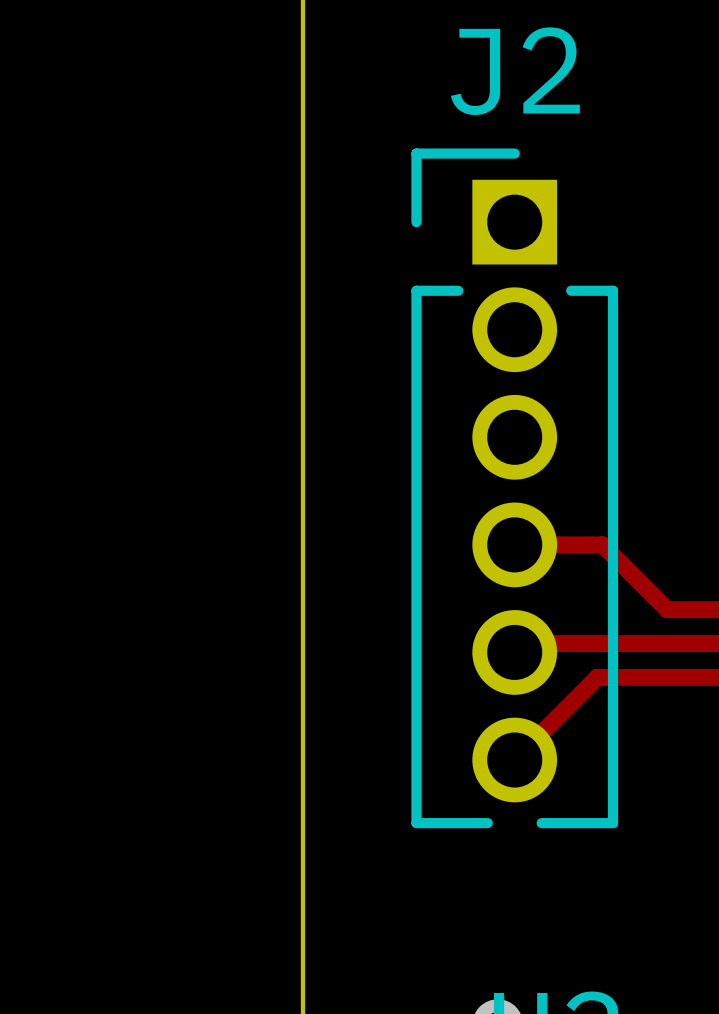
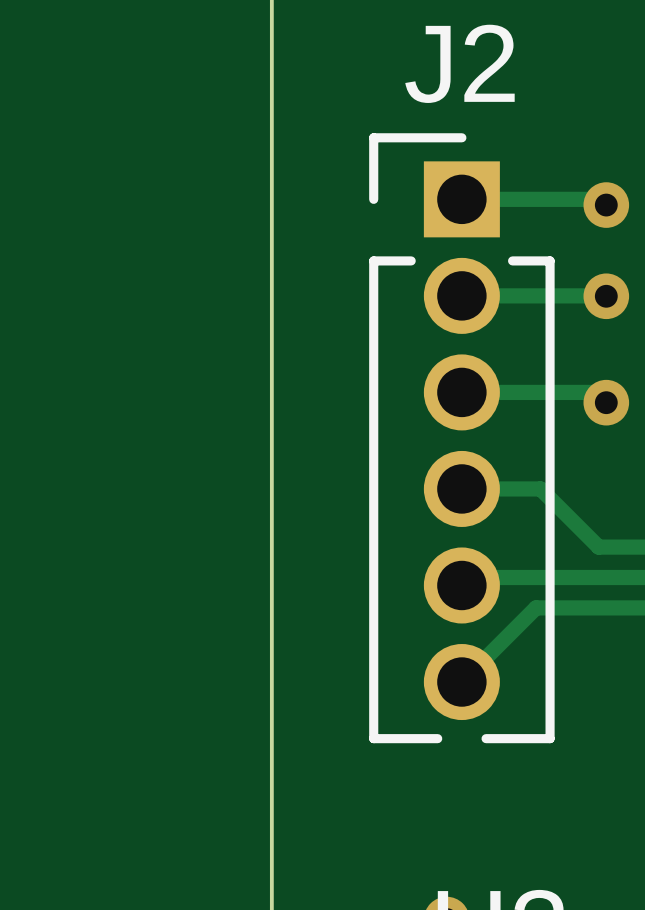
track: none -> (461, 199) (600, 199) (606, 205)
via: none -> (606, 205)
track: none -> (461, 295) (605, 295)
via: none -> (606, 296)
track: none -> (461, 392) (596, 392) (606, 402)
via: none -> (606, 402)

